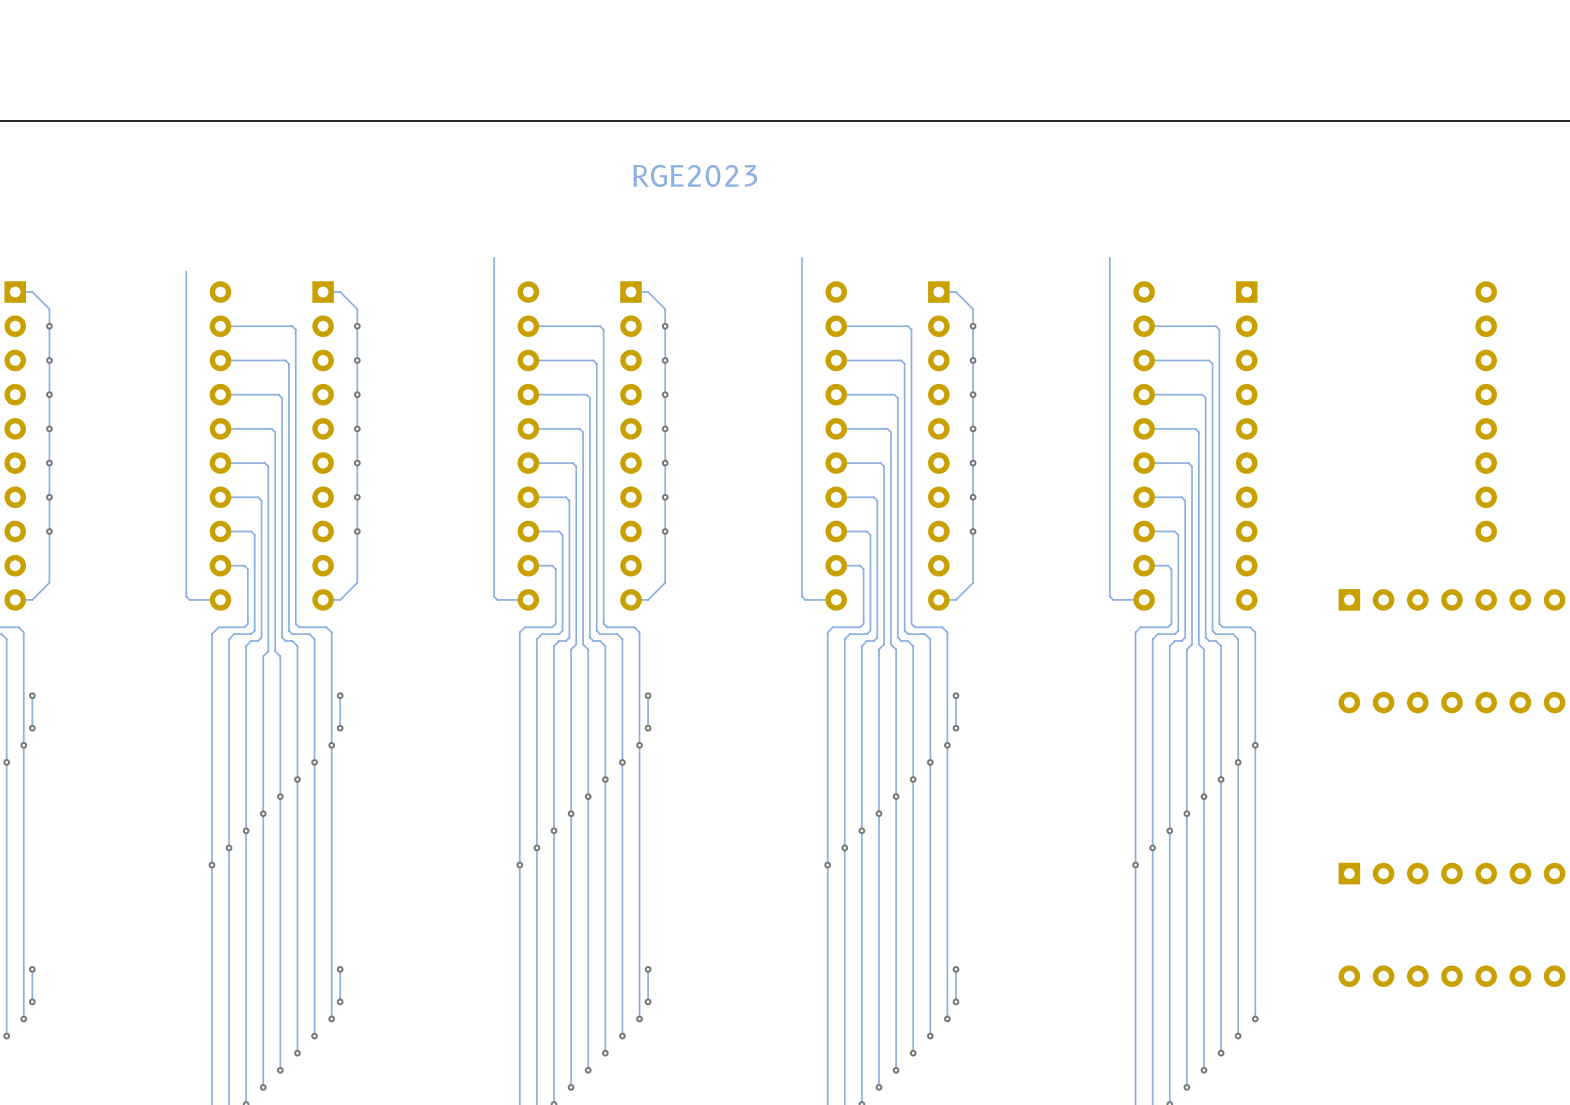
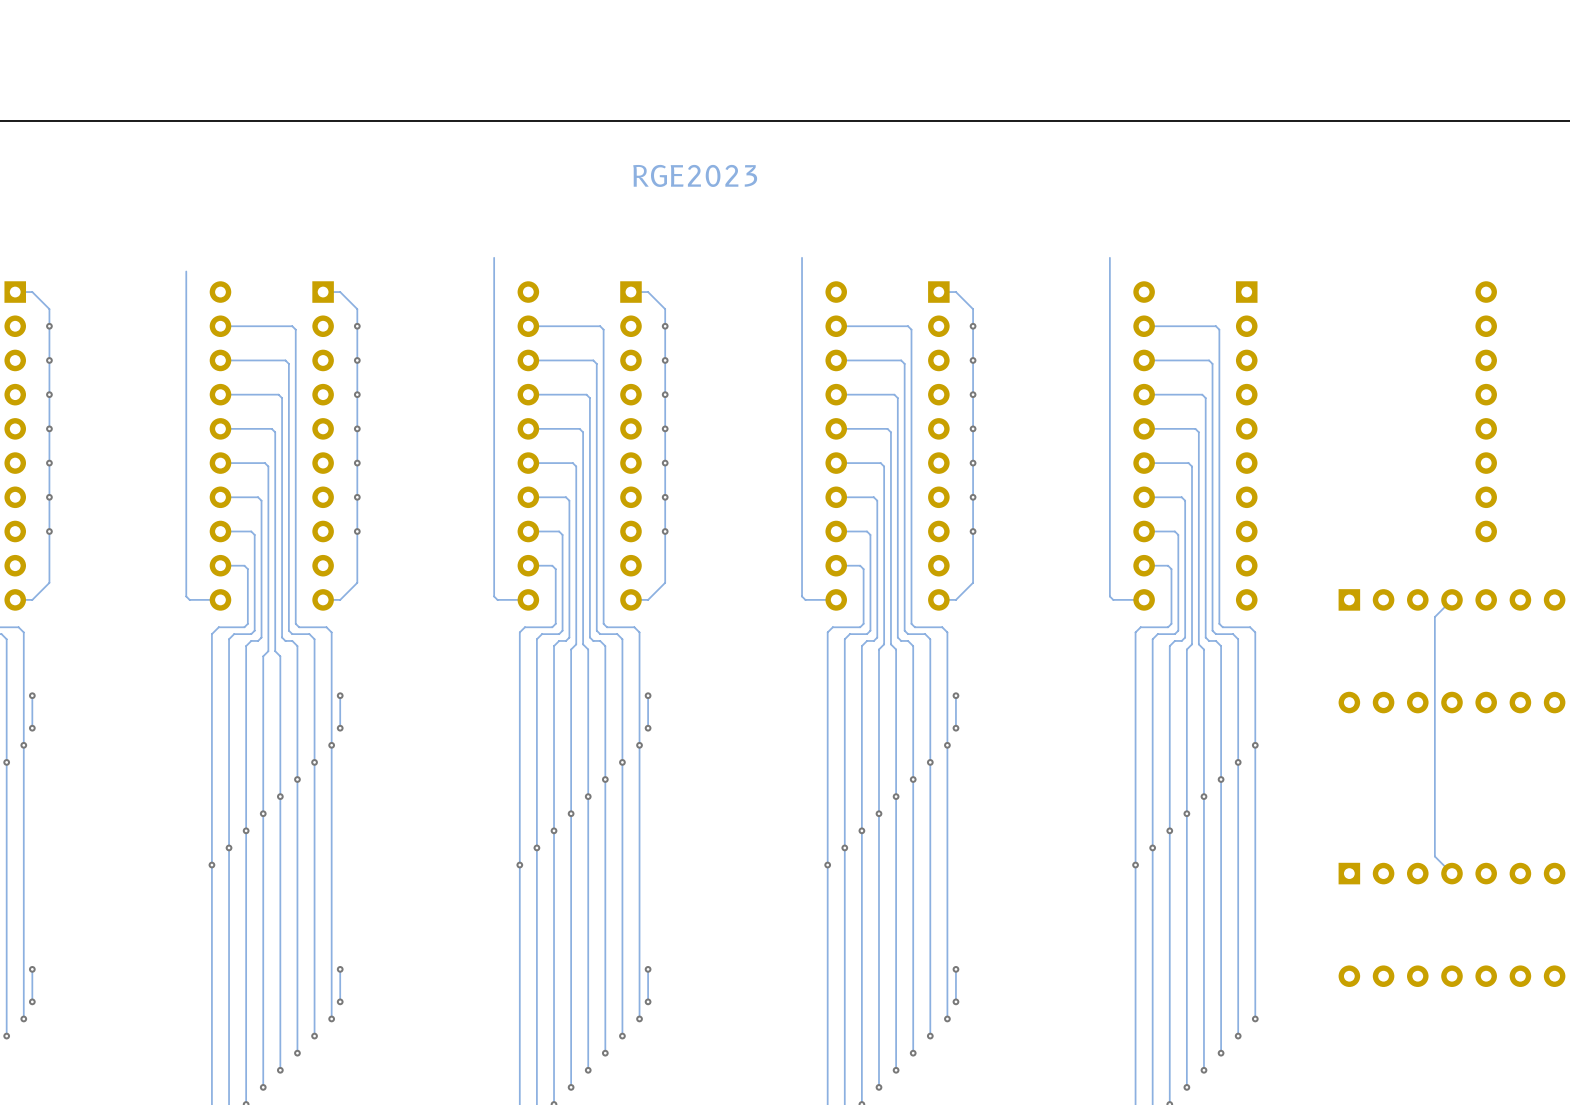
track: none -> (1451, 599) (1434, 617) (1434, 856) (1451, 873)

